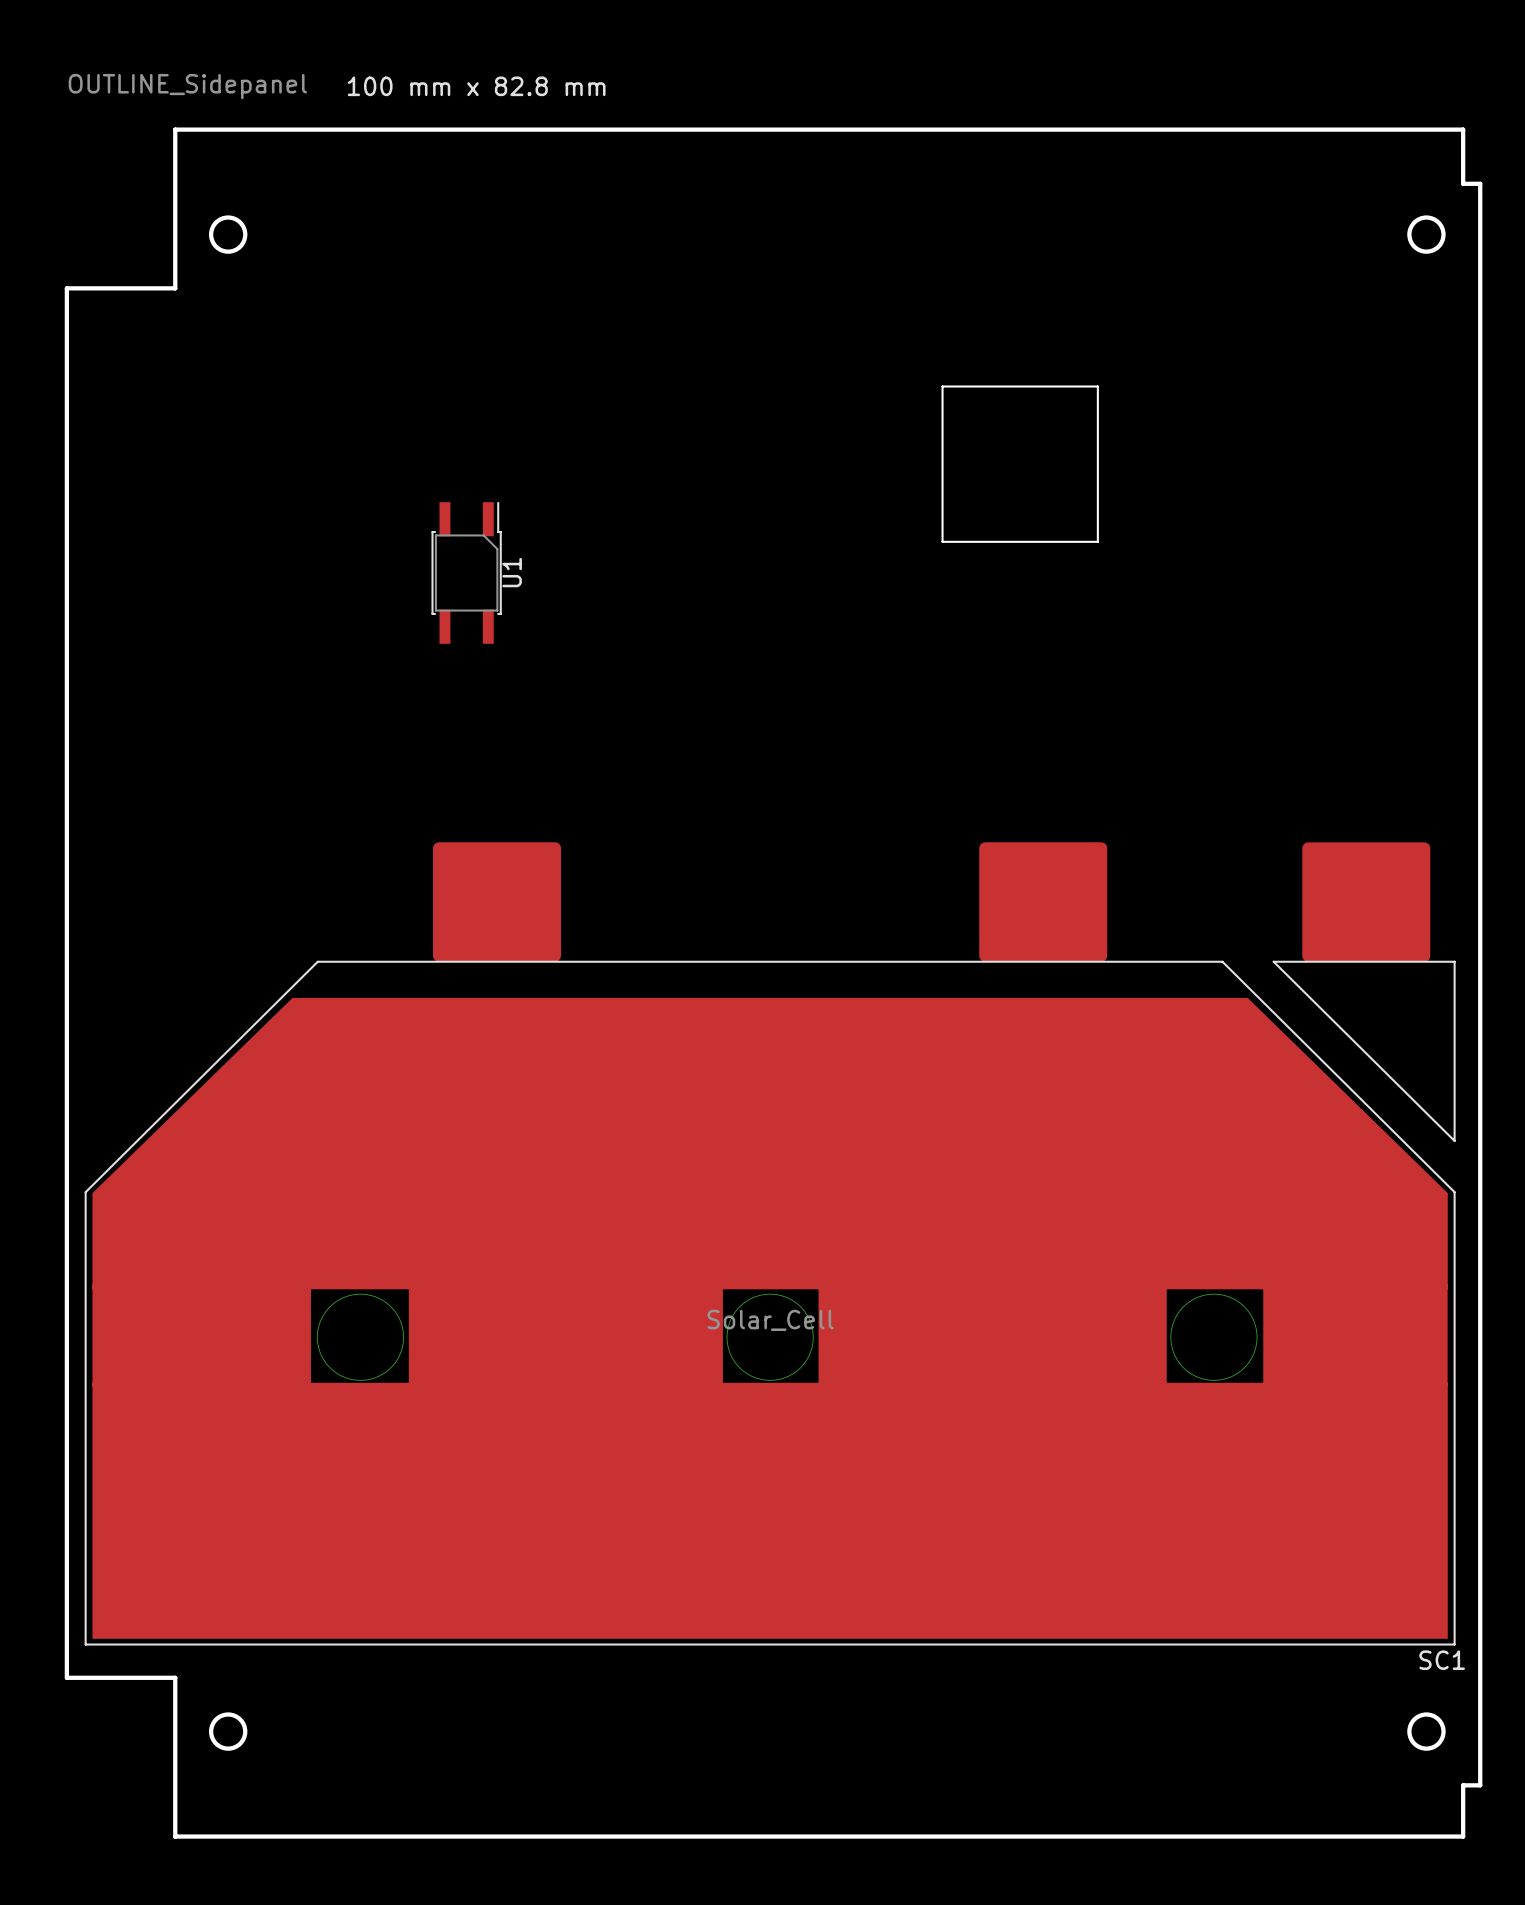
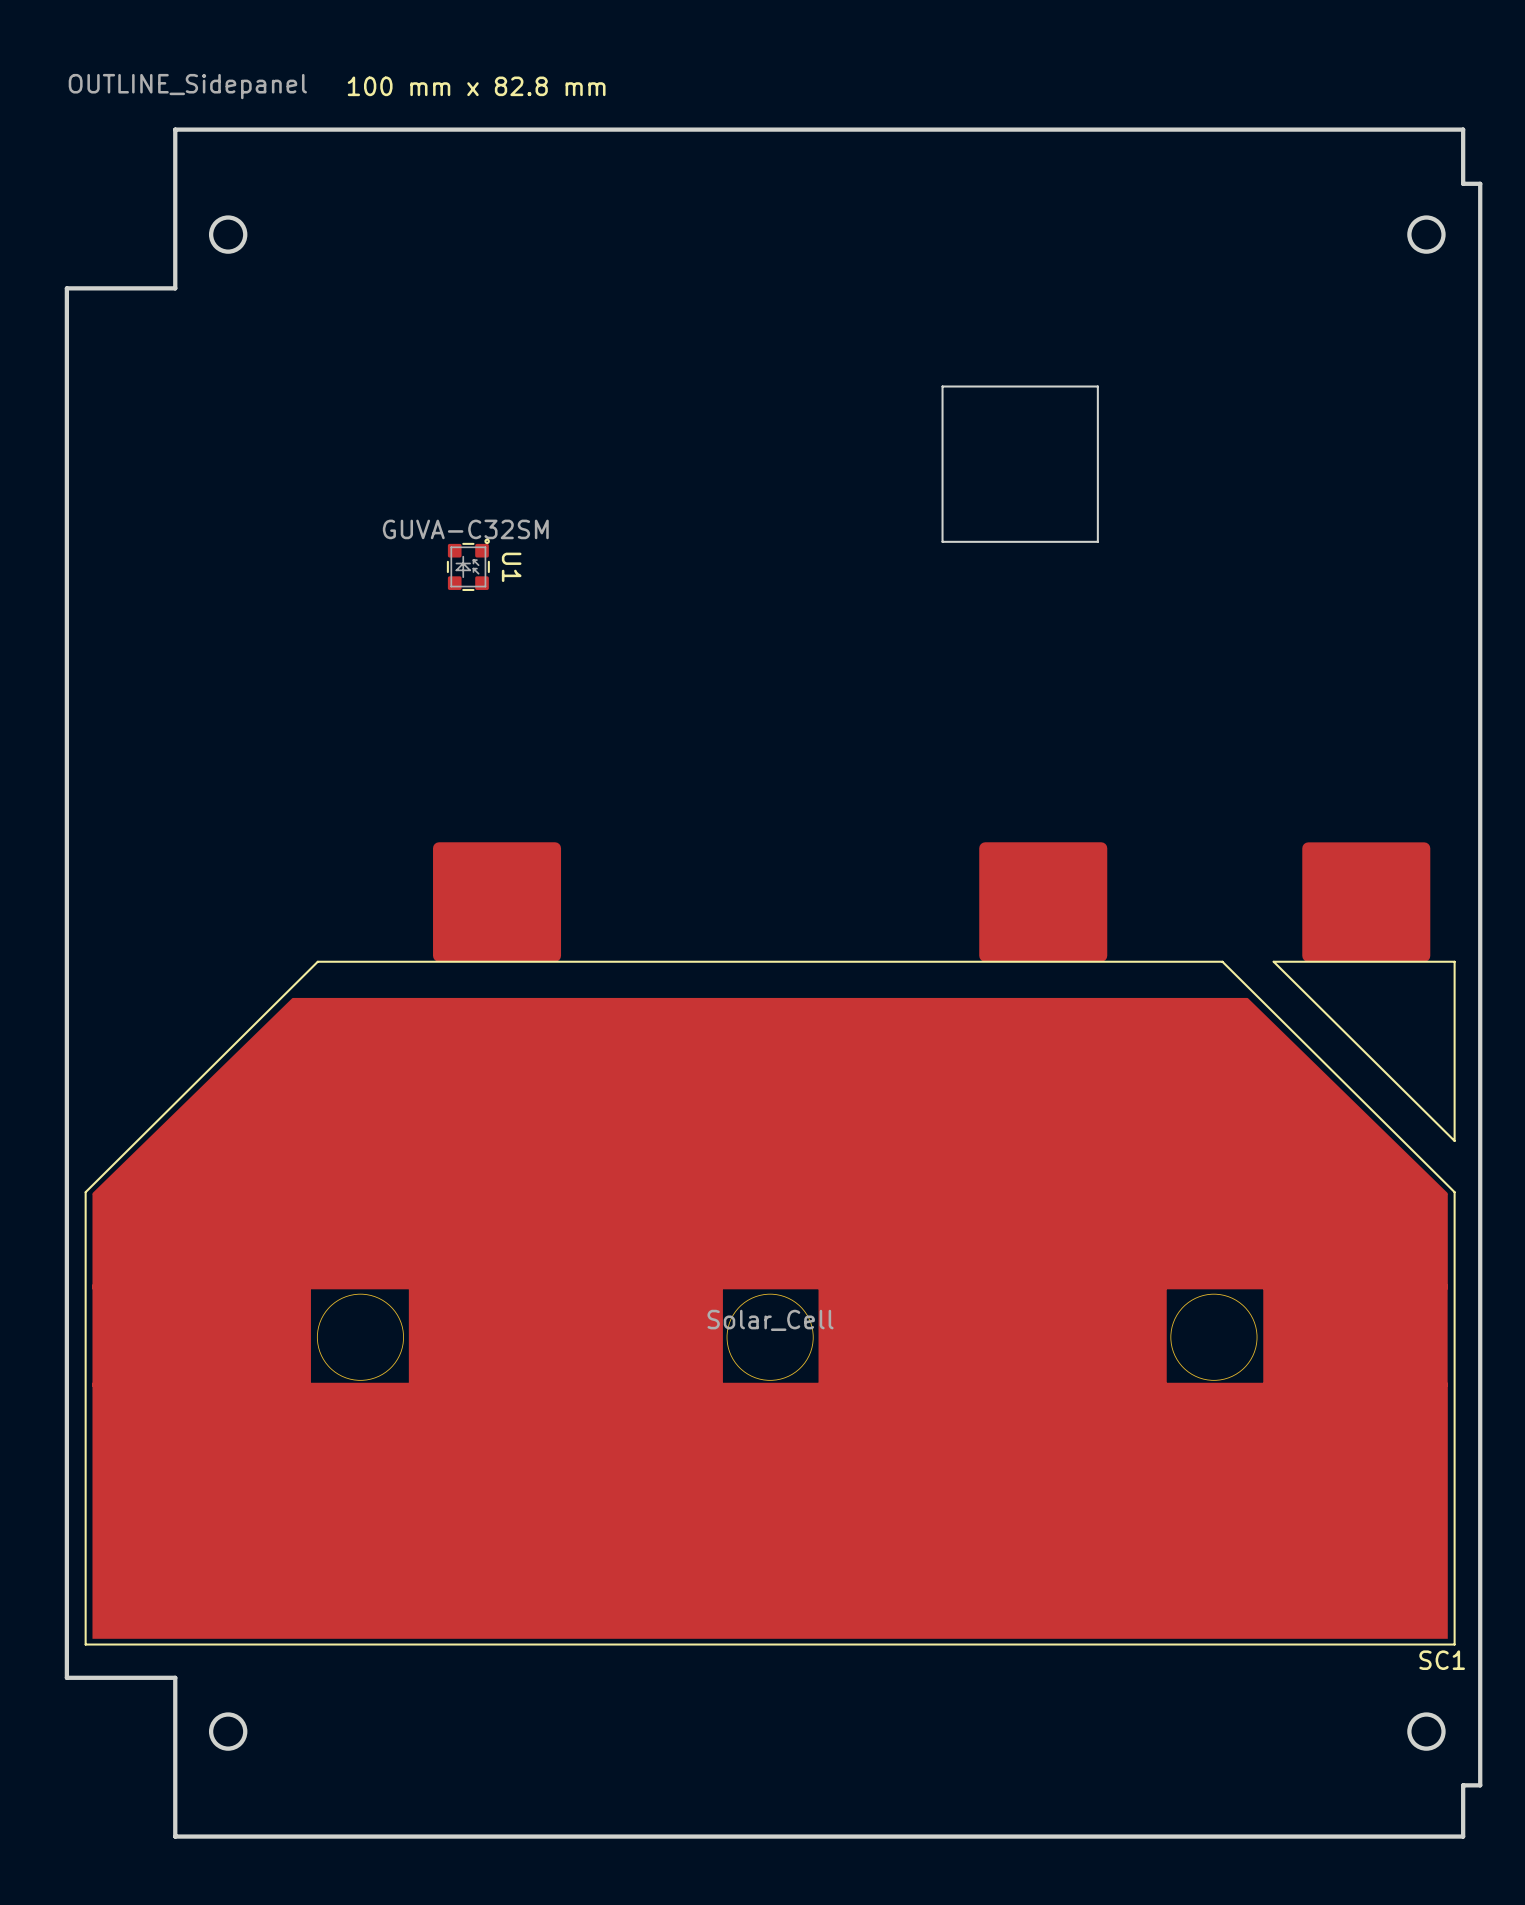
U1 footprint: [431, 501, 502, 644] -> [446, 538, 490, 591]
U1 value: none -> GUVA-C32SM (465, 529)

